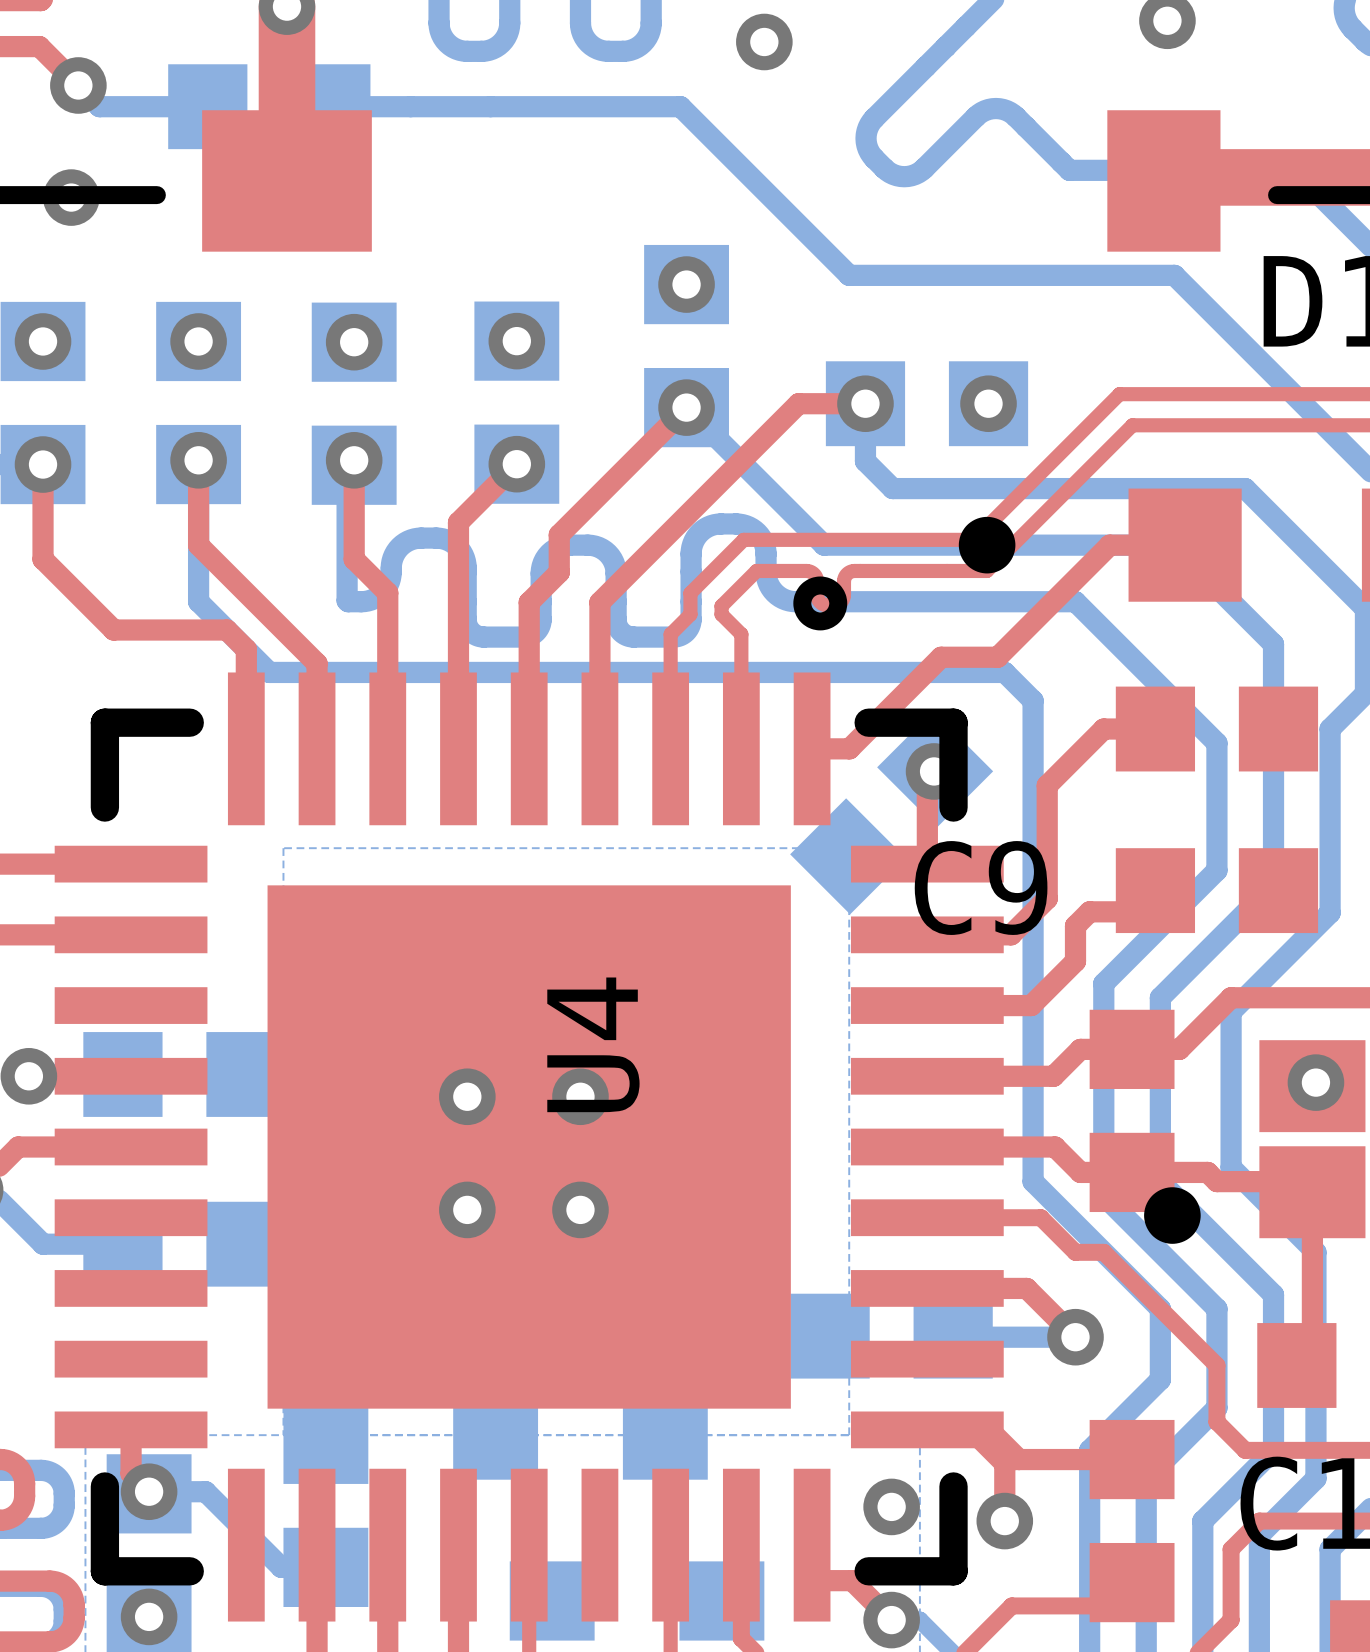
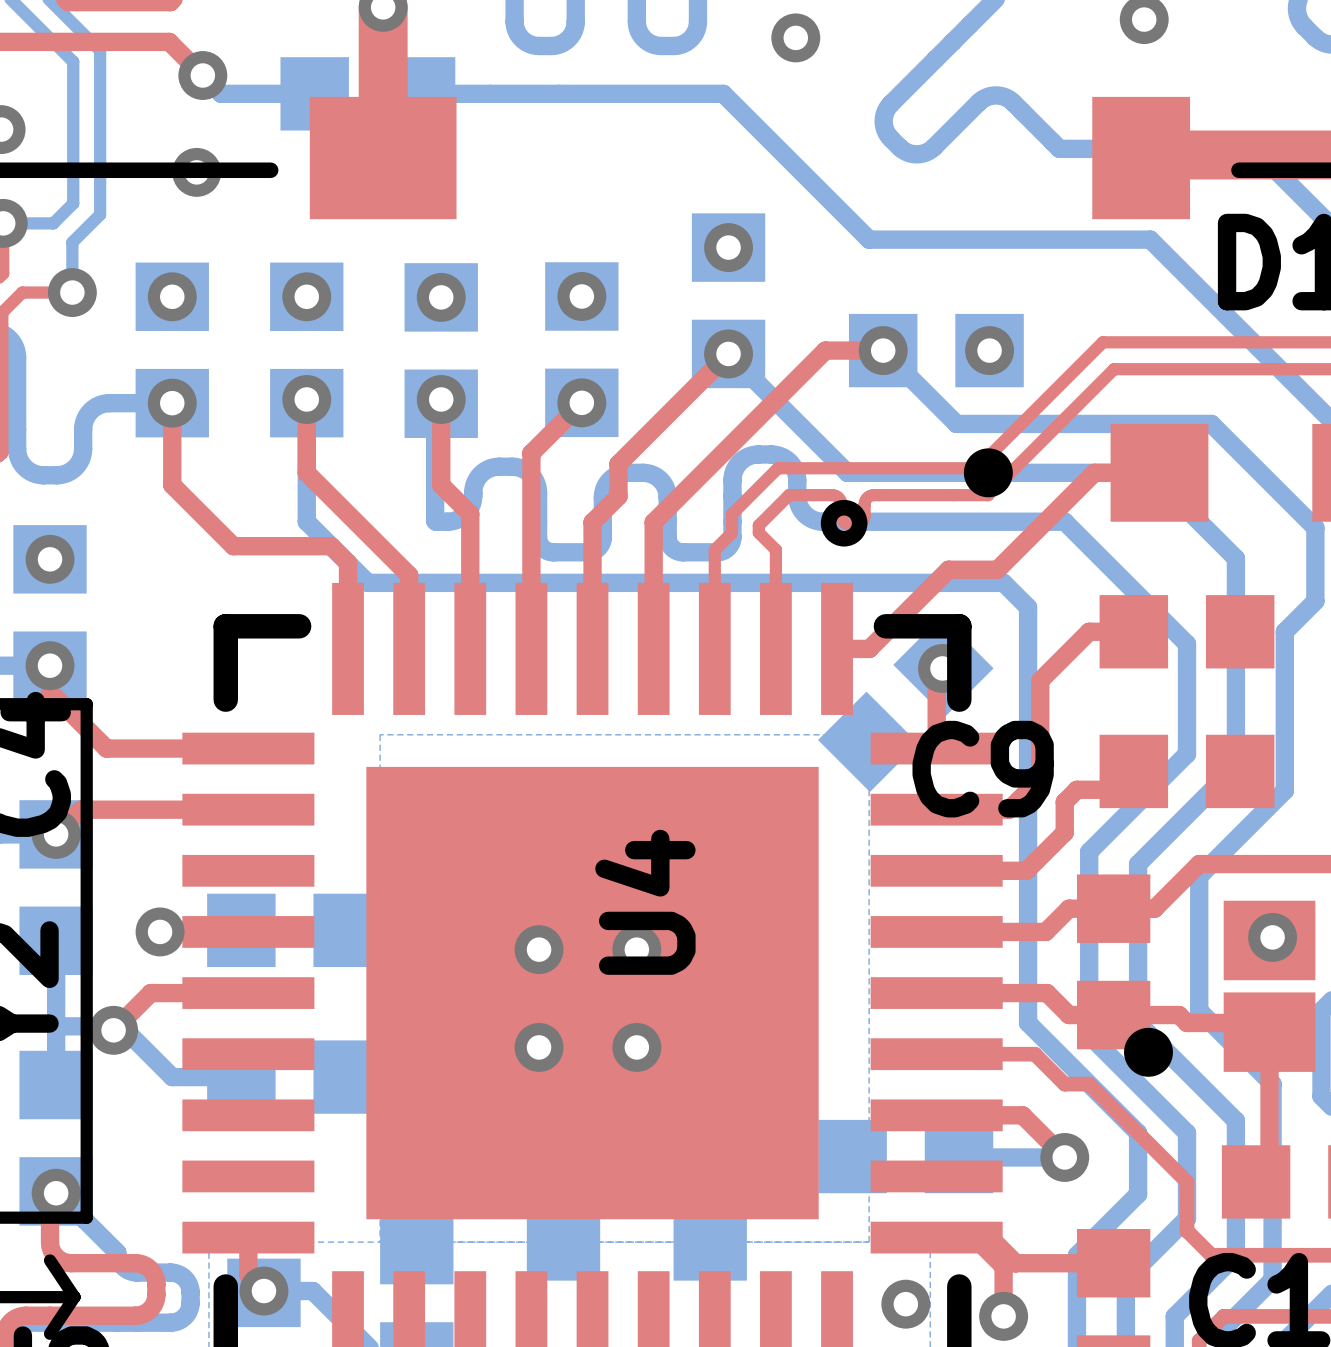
bottom track: (865, 403) (865, 461) (892, 488) (950, 488) -> (883, 350) (956, 423)

